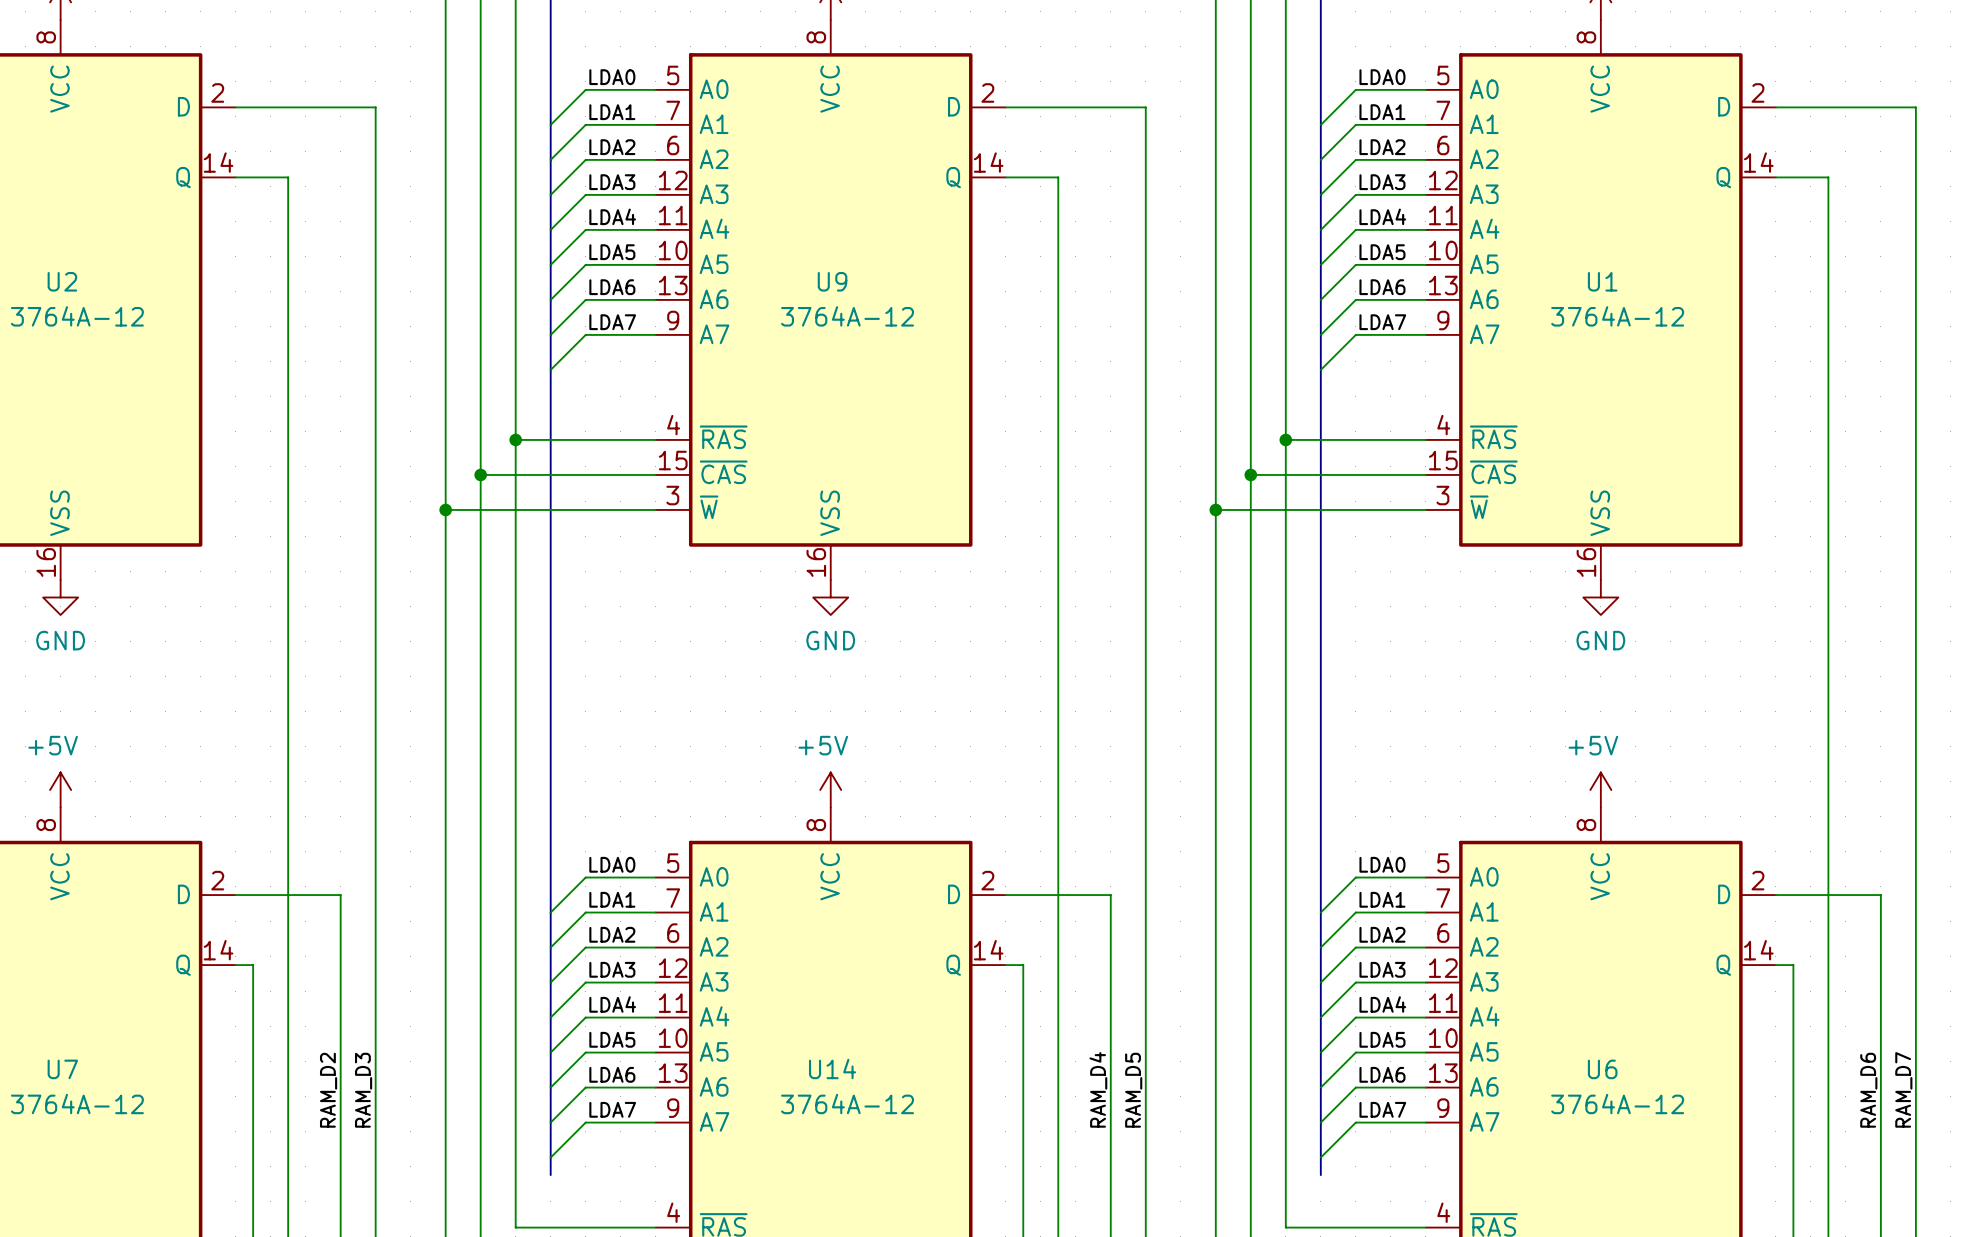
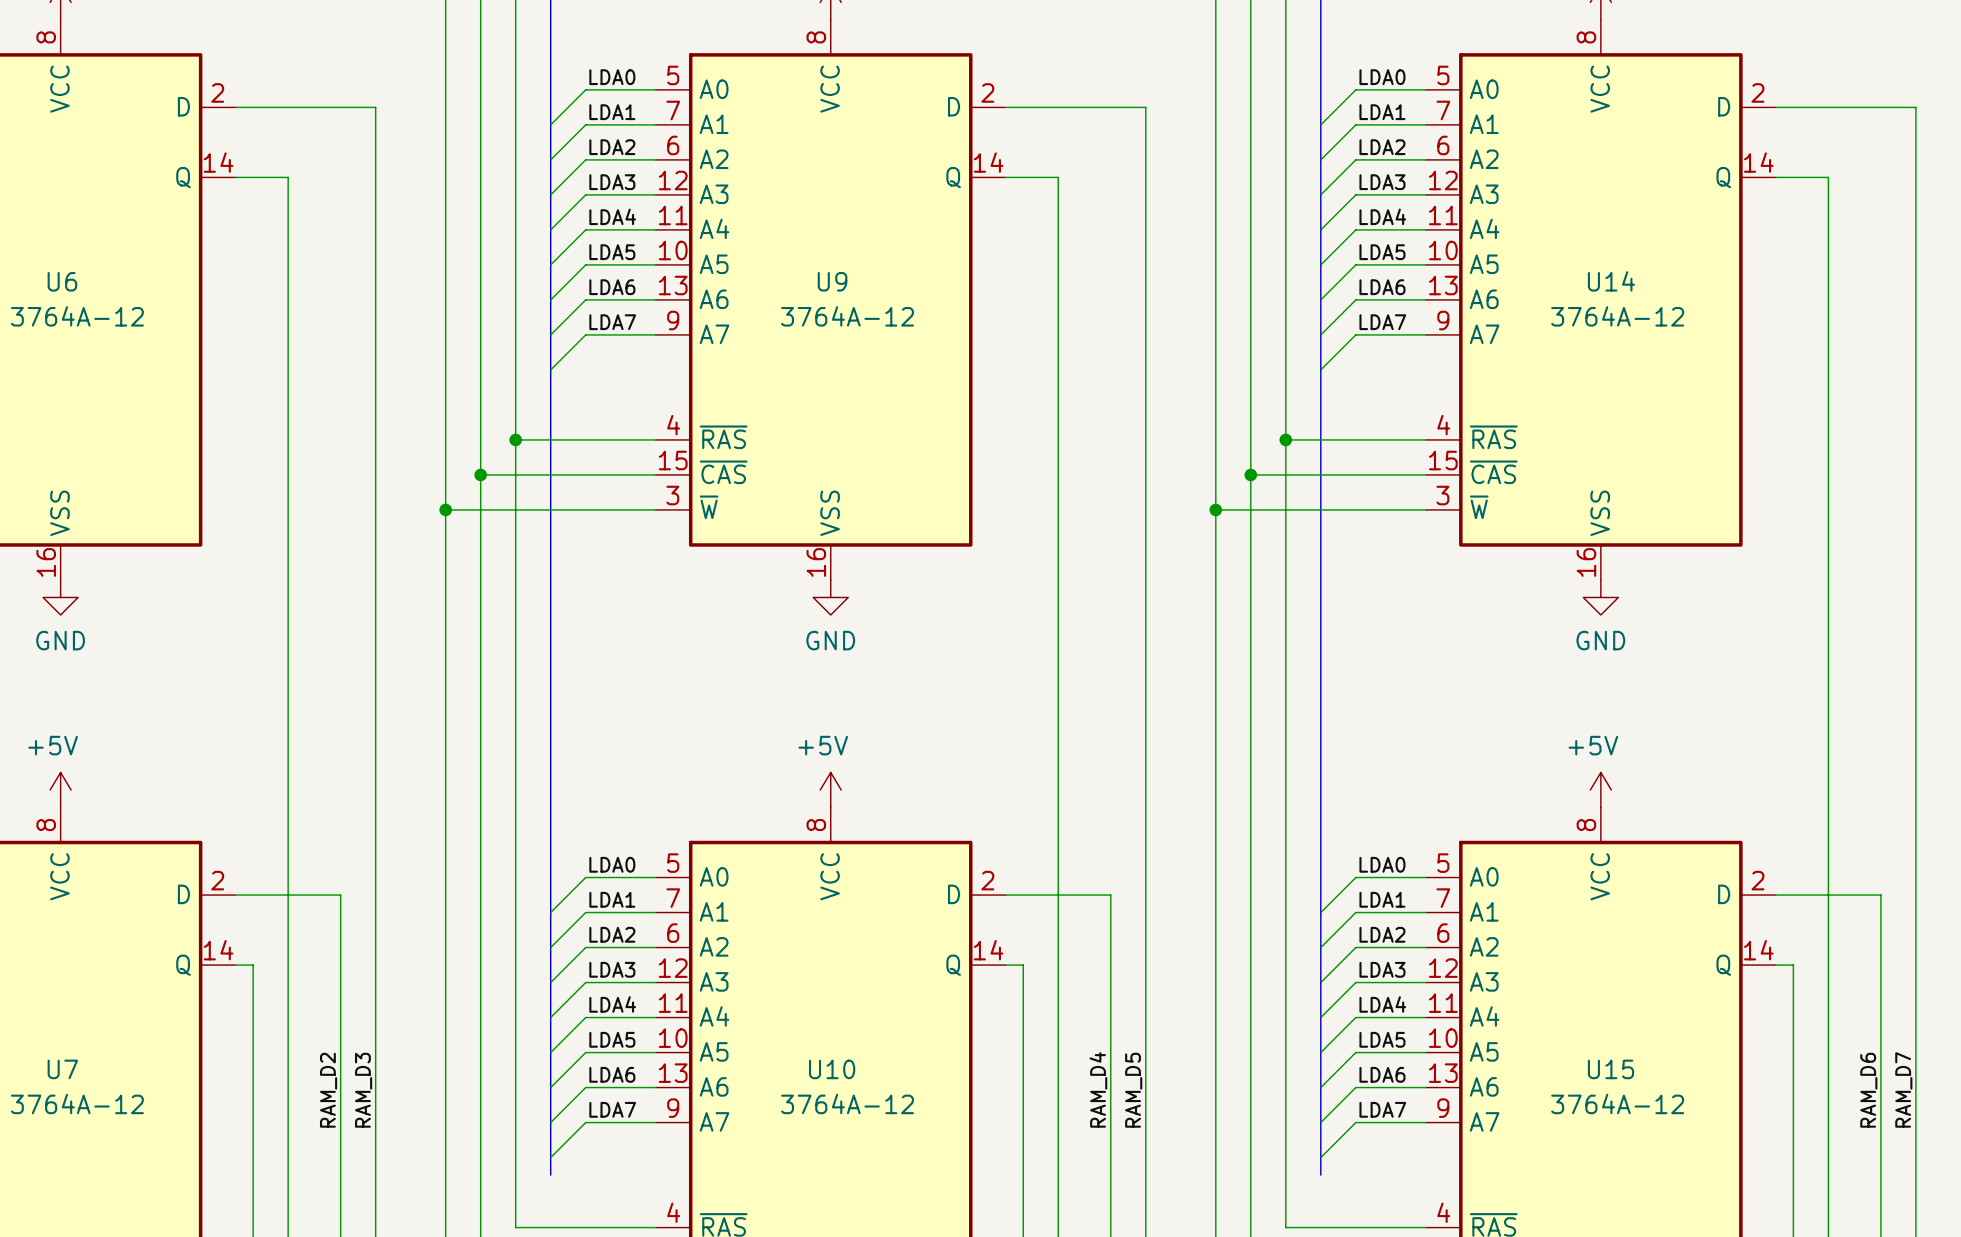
U2 name: U2 (62, 281) -> U6 (62, 281)
U1 name: U1 (1602, 281) -> U14 (1611, 281)
U14 name: U14 (832, 1068) -> U10 (832, 1069)
U6 name: U6 (1602, 1069) -> U15 (1610, 1069)

